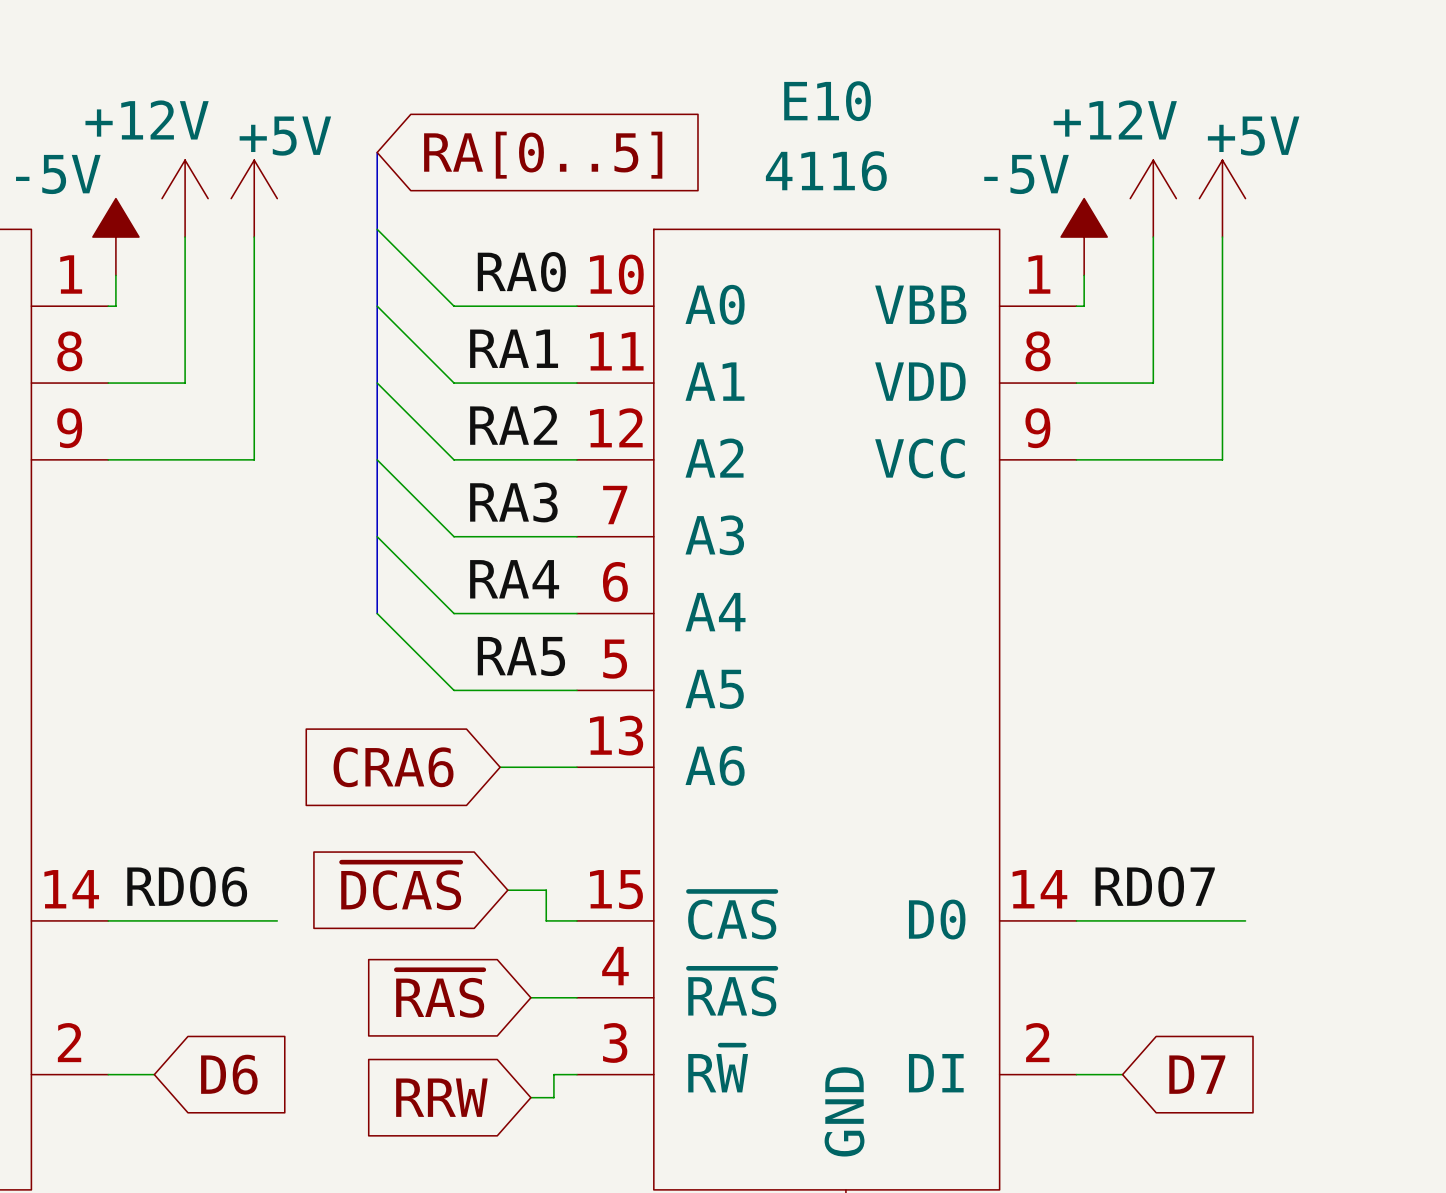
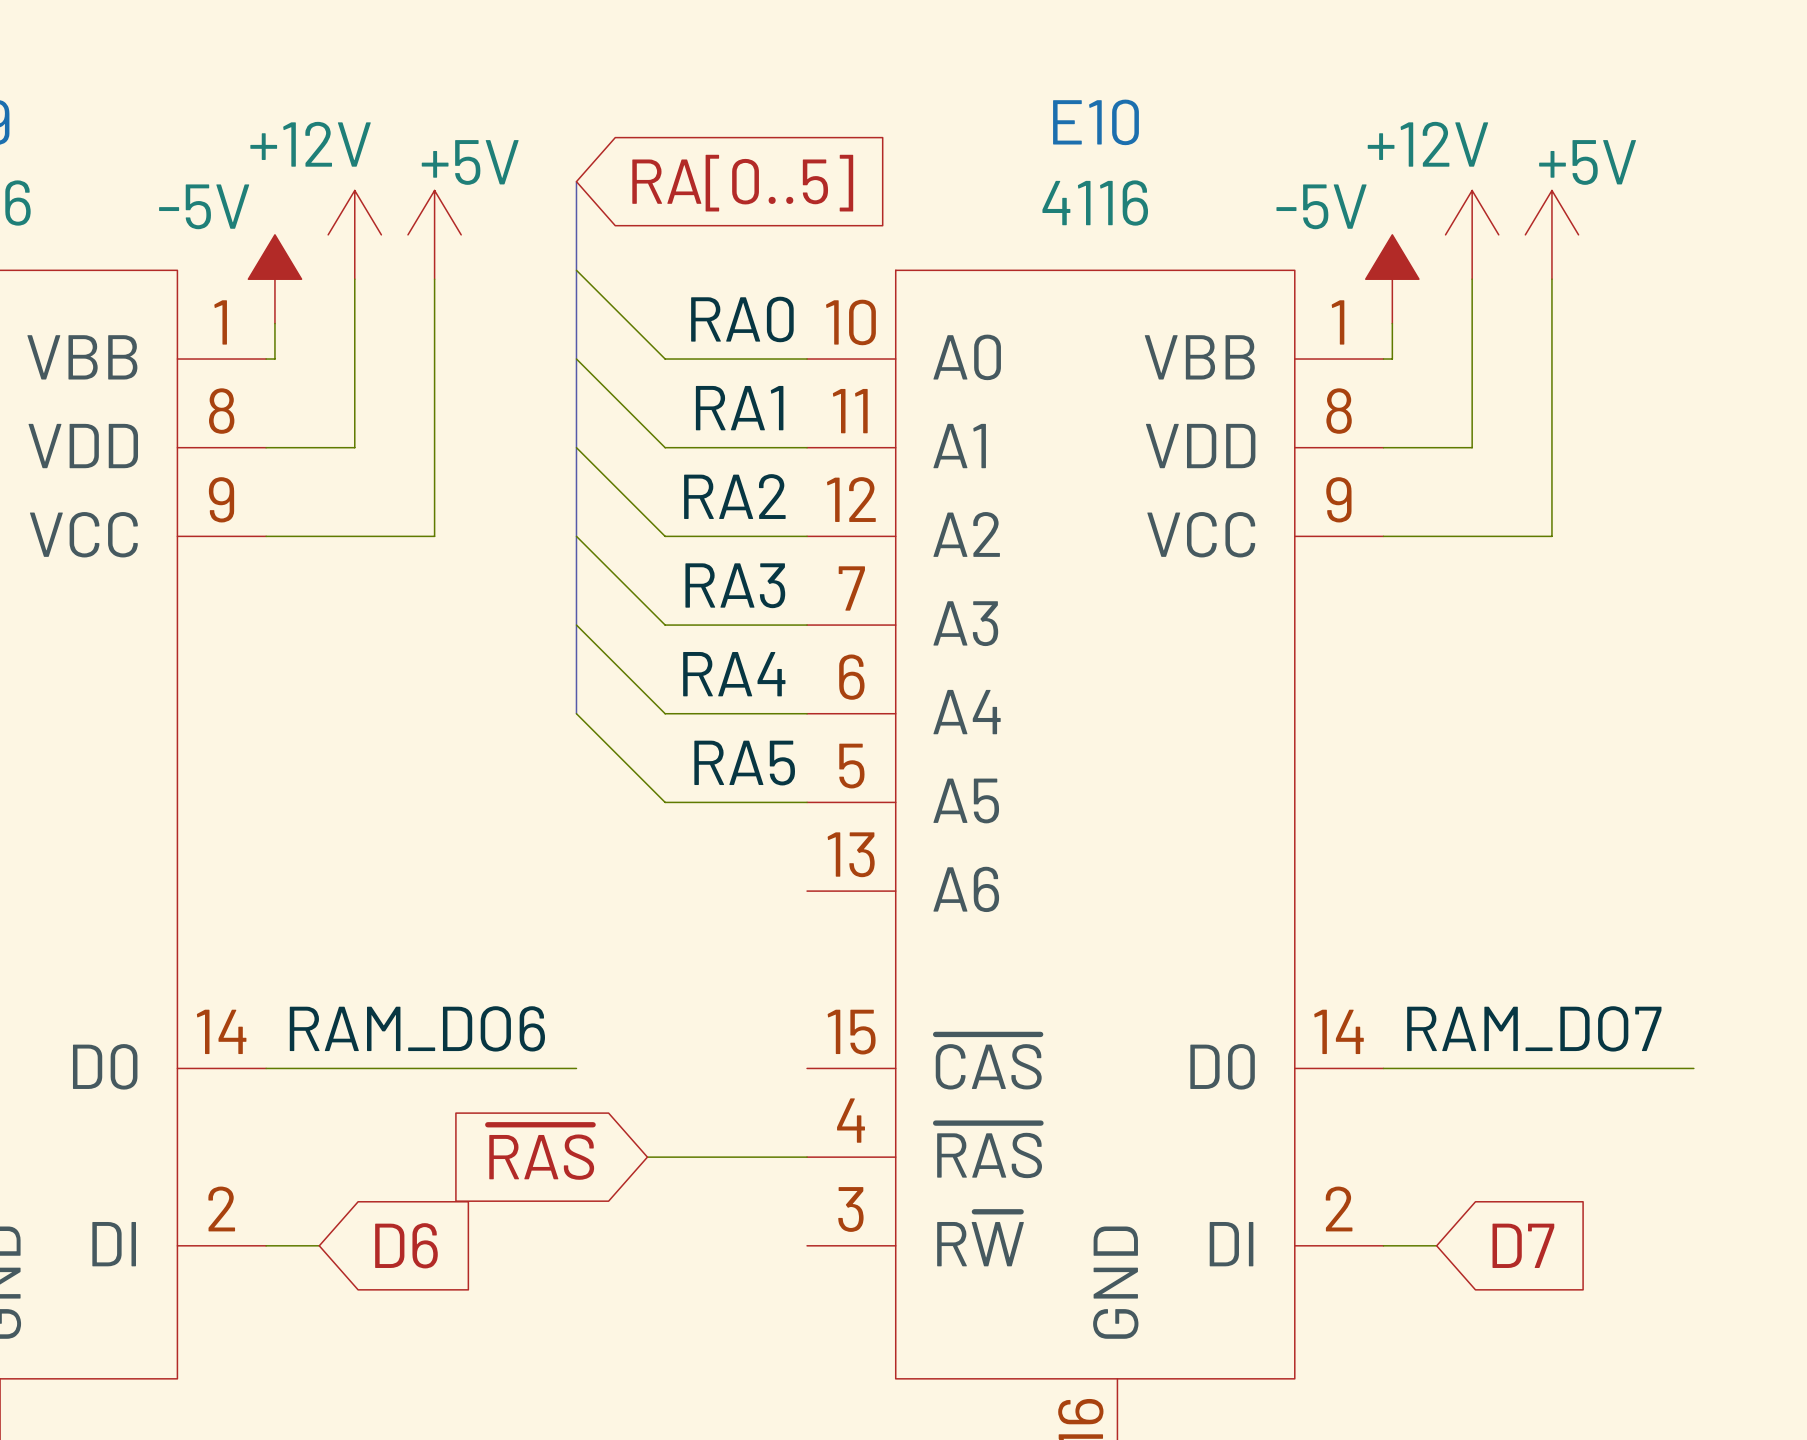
global label: CRA6 (393, 767) -> none
wire: (500, 767) (576, 767) -> none
label: RDO6 (187, 886) -> RAM_DO6 (417, 1028)
global label: ~{DCAS} (401, 886) -> none
label: RDO7 (1155, 886) -> RAM_DO7 (1534, 1028)
wire: (507, 890) (546, 890) (546, 920) (576, 920) -> none
wire: none -> (461, 1068) (576, 1068)
wire: none -> (1578, 1068) (1693, 1068)
global label position: ~{RAS} (440, 993) -> ~{RAS} (540, 1152)
wire: none -> (647, 1157) (753, 1157)
wire: (576, 1074) (553, 1074) (553, 1097) (530, 1097) -> none
global label: RRW (441, 1097) -> none

